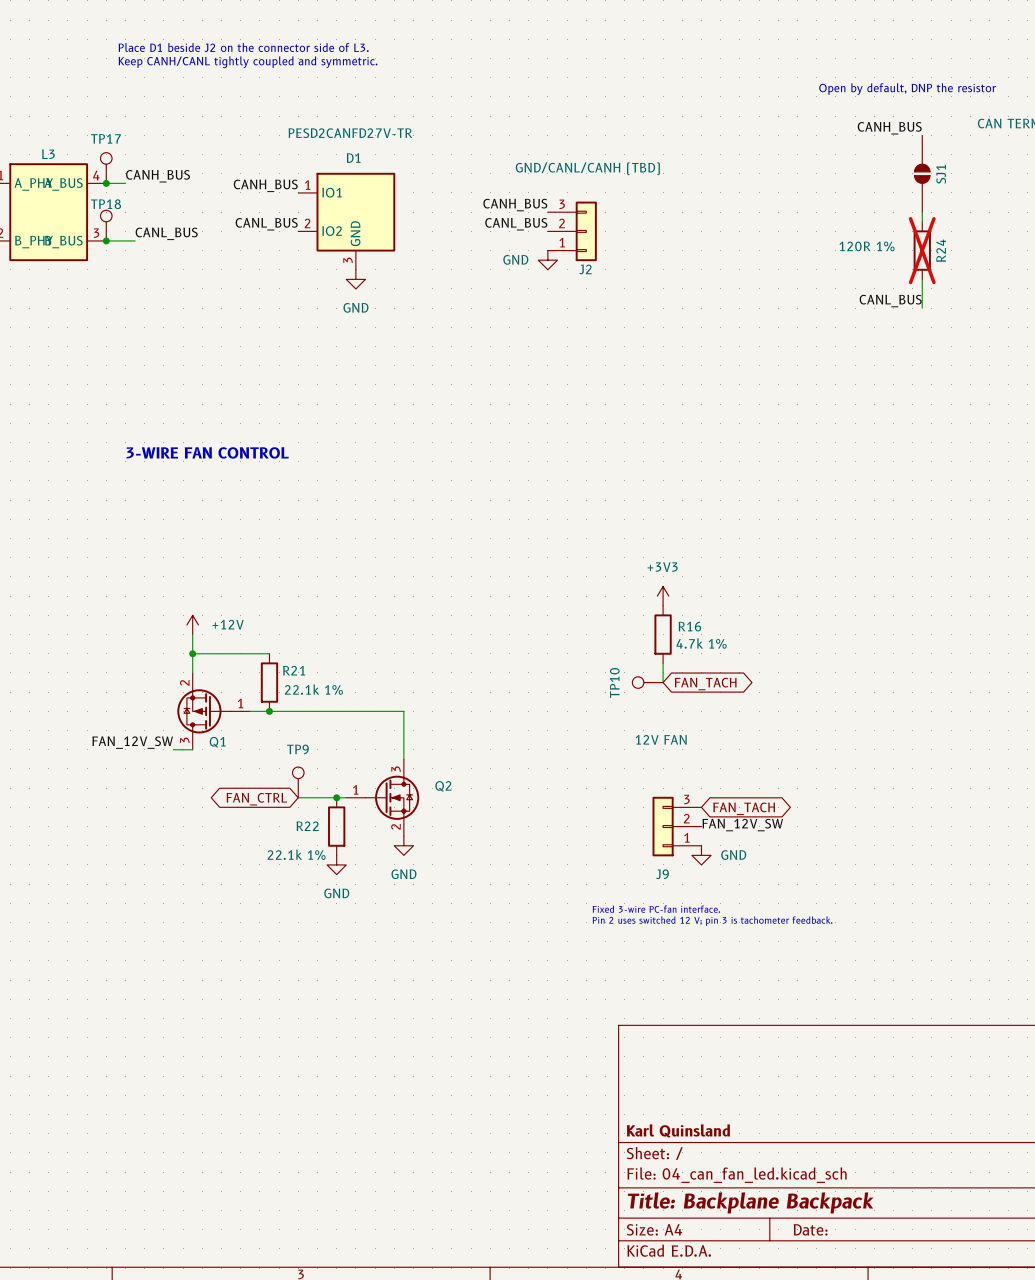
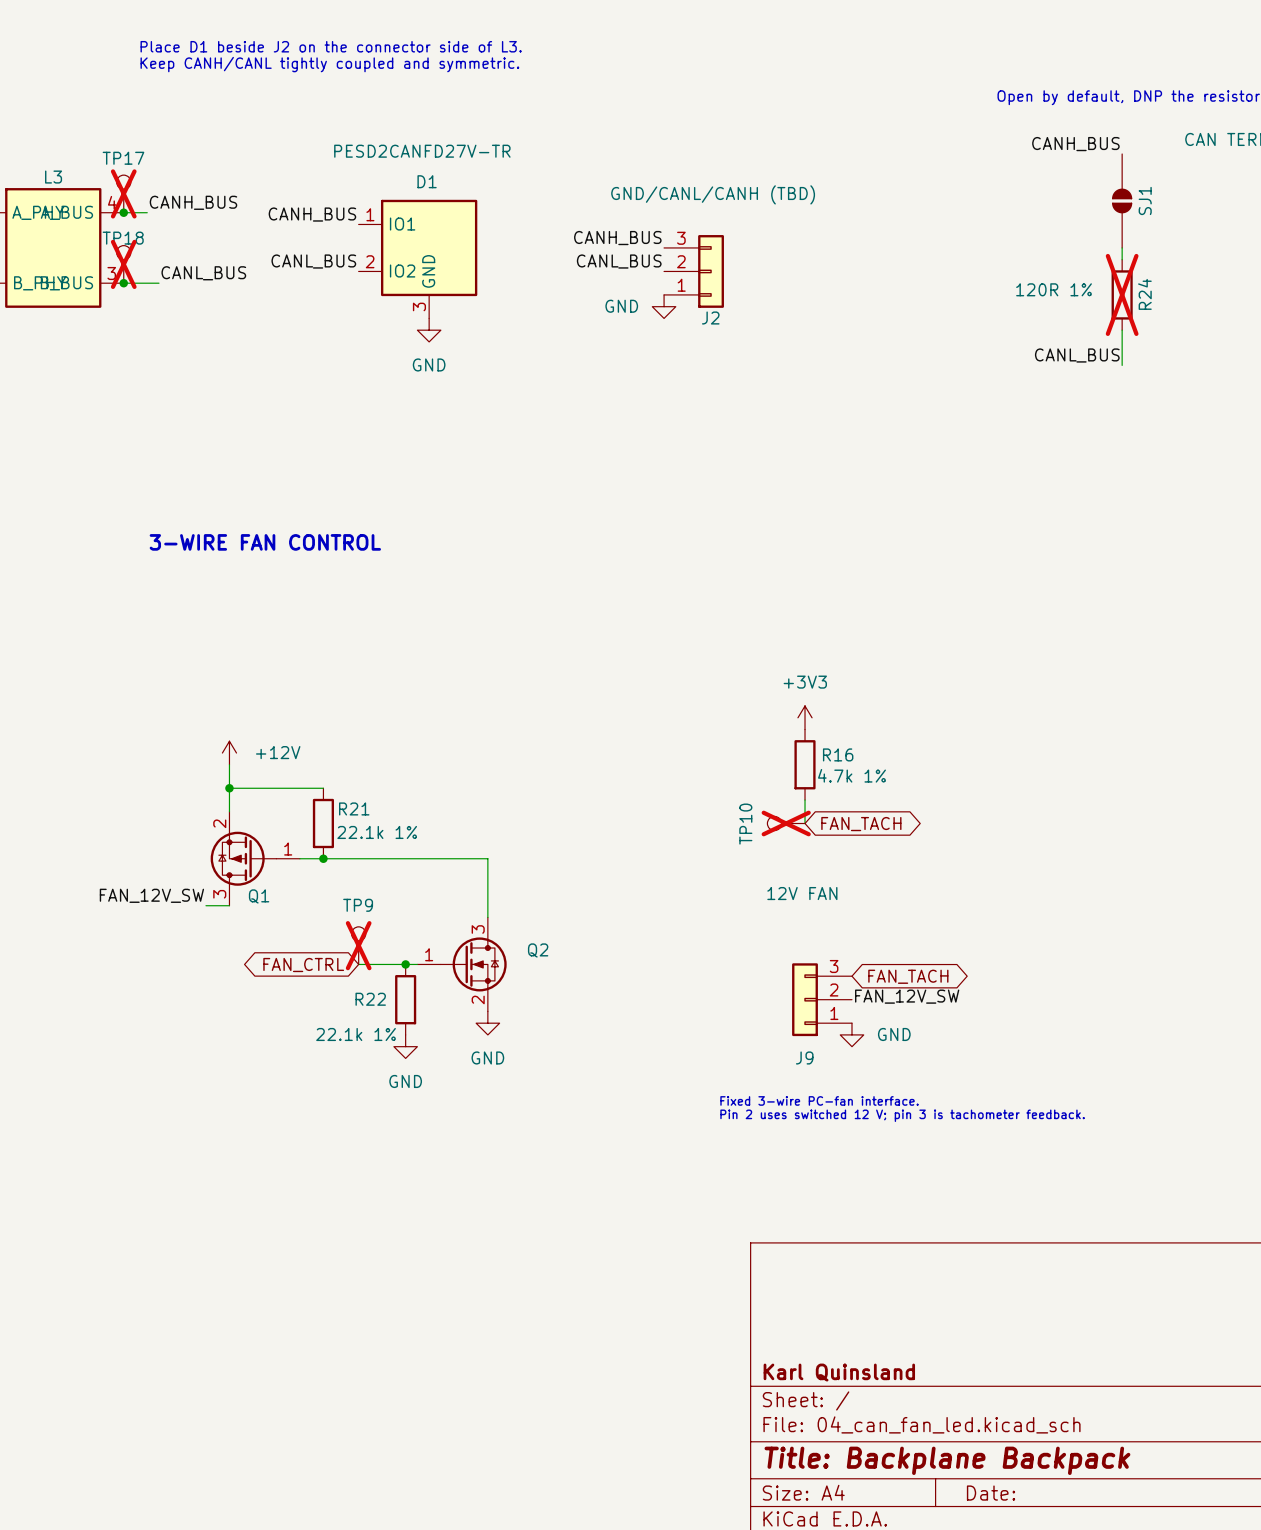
TP17 do-not-place cross: none -> (123, 193)
TP18 do-not-place cross: none -> (123, 264)
TP10 do-not-place cross: none -> (786, 823)
TP9 do-not-place cross: none -> (358, 945)

